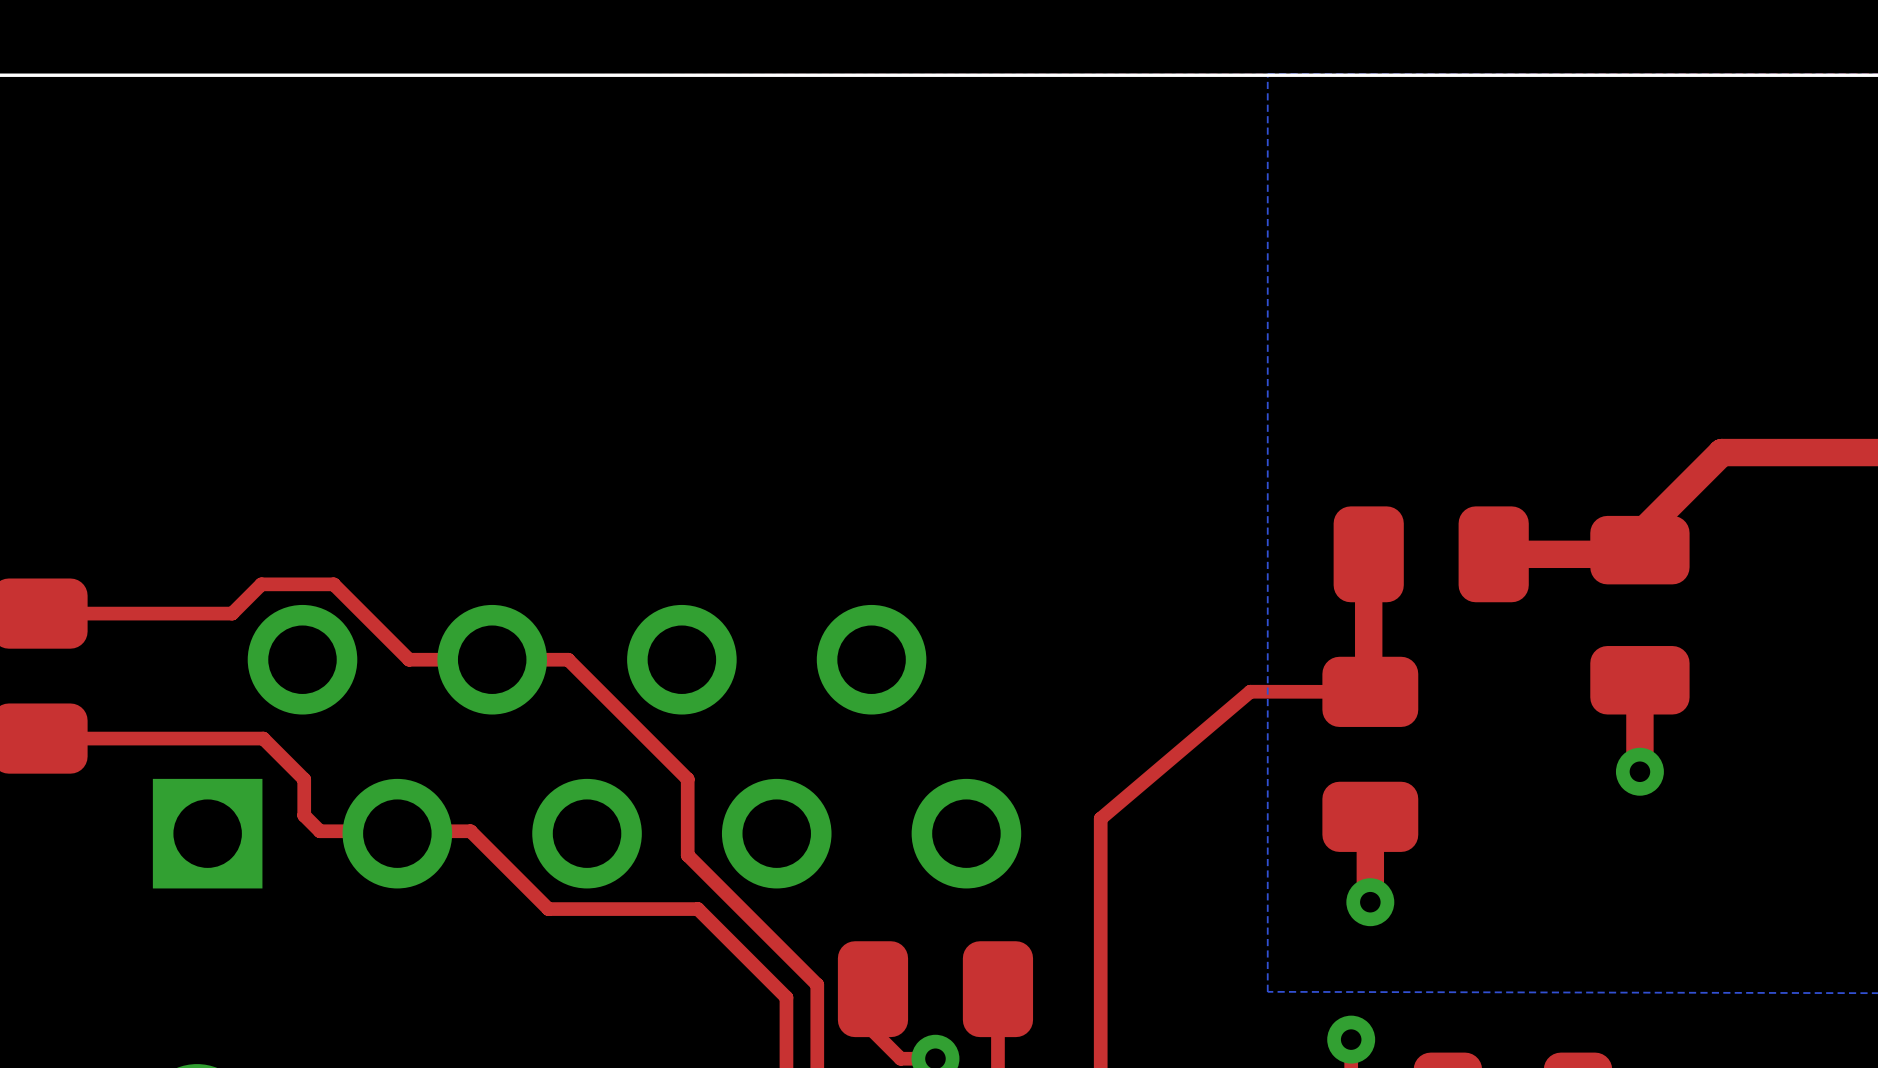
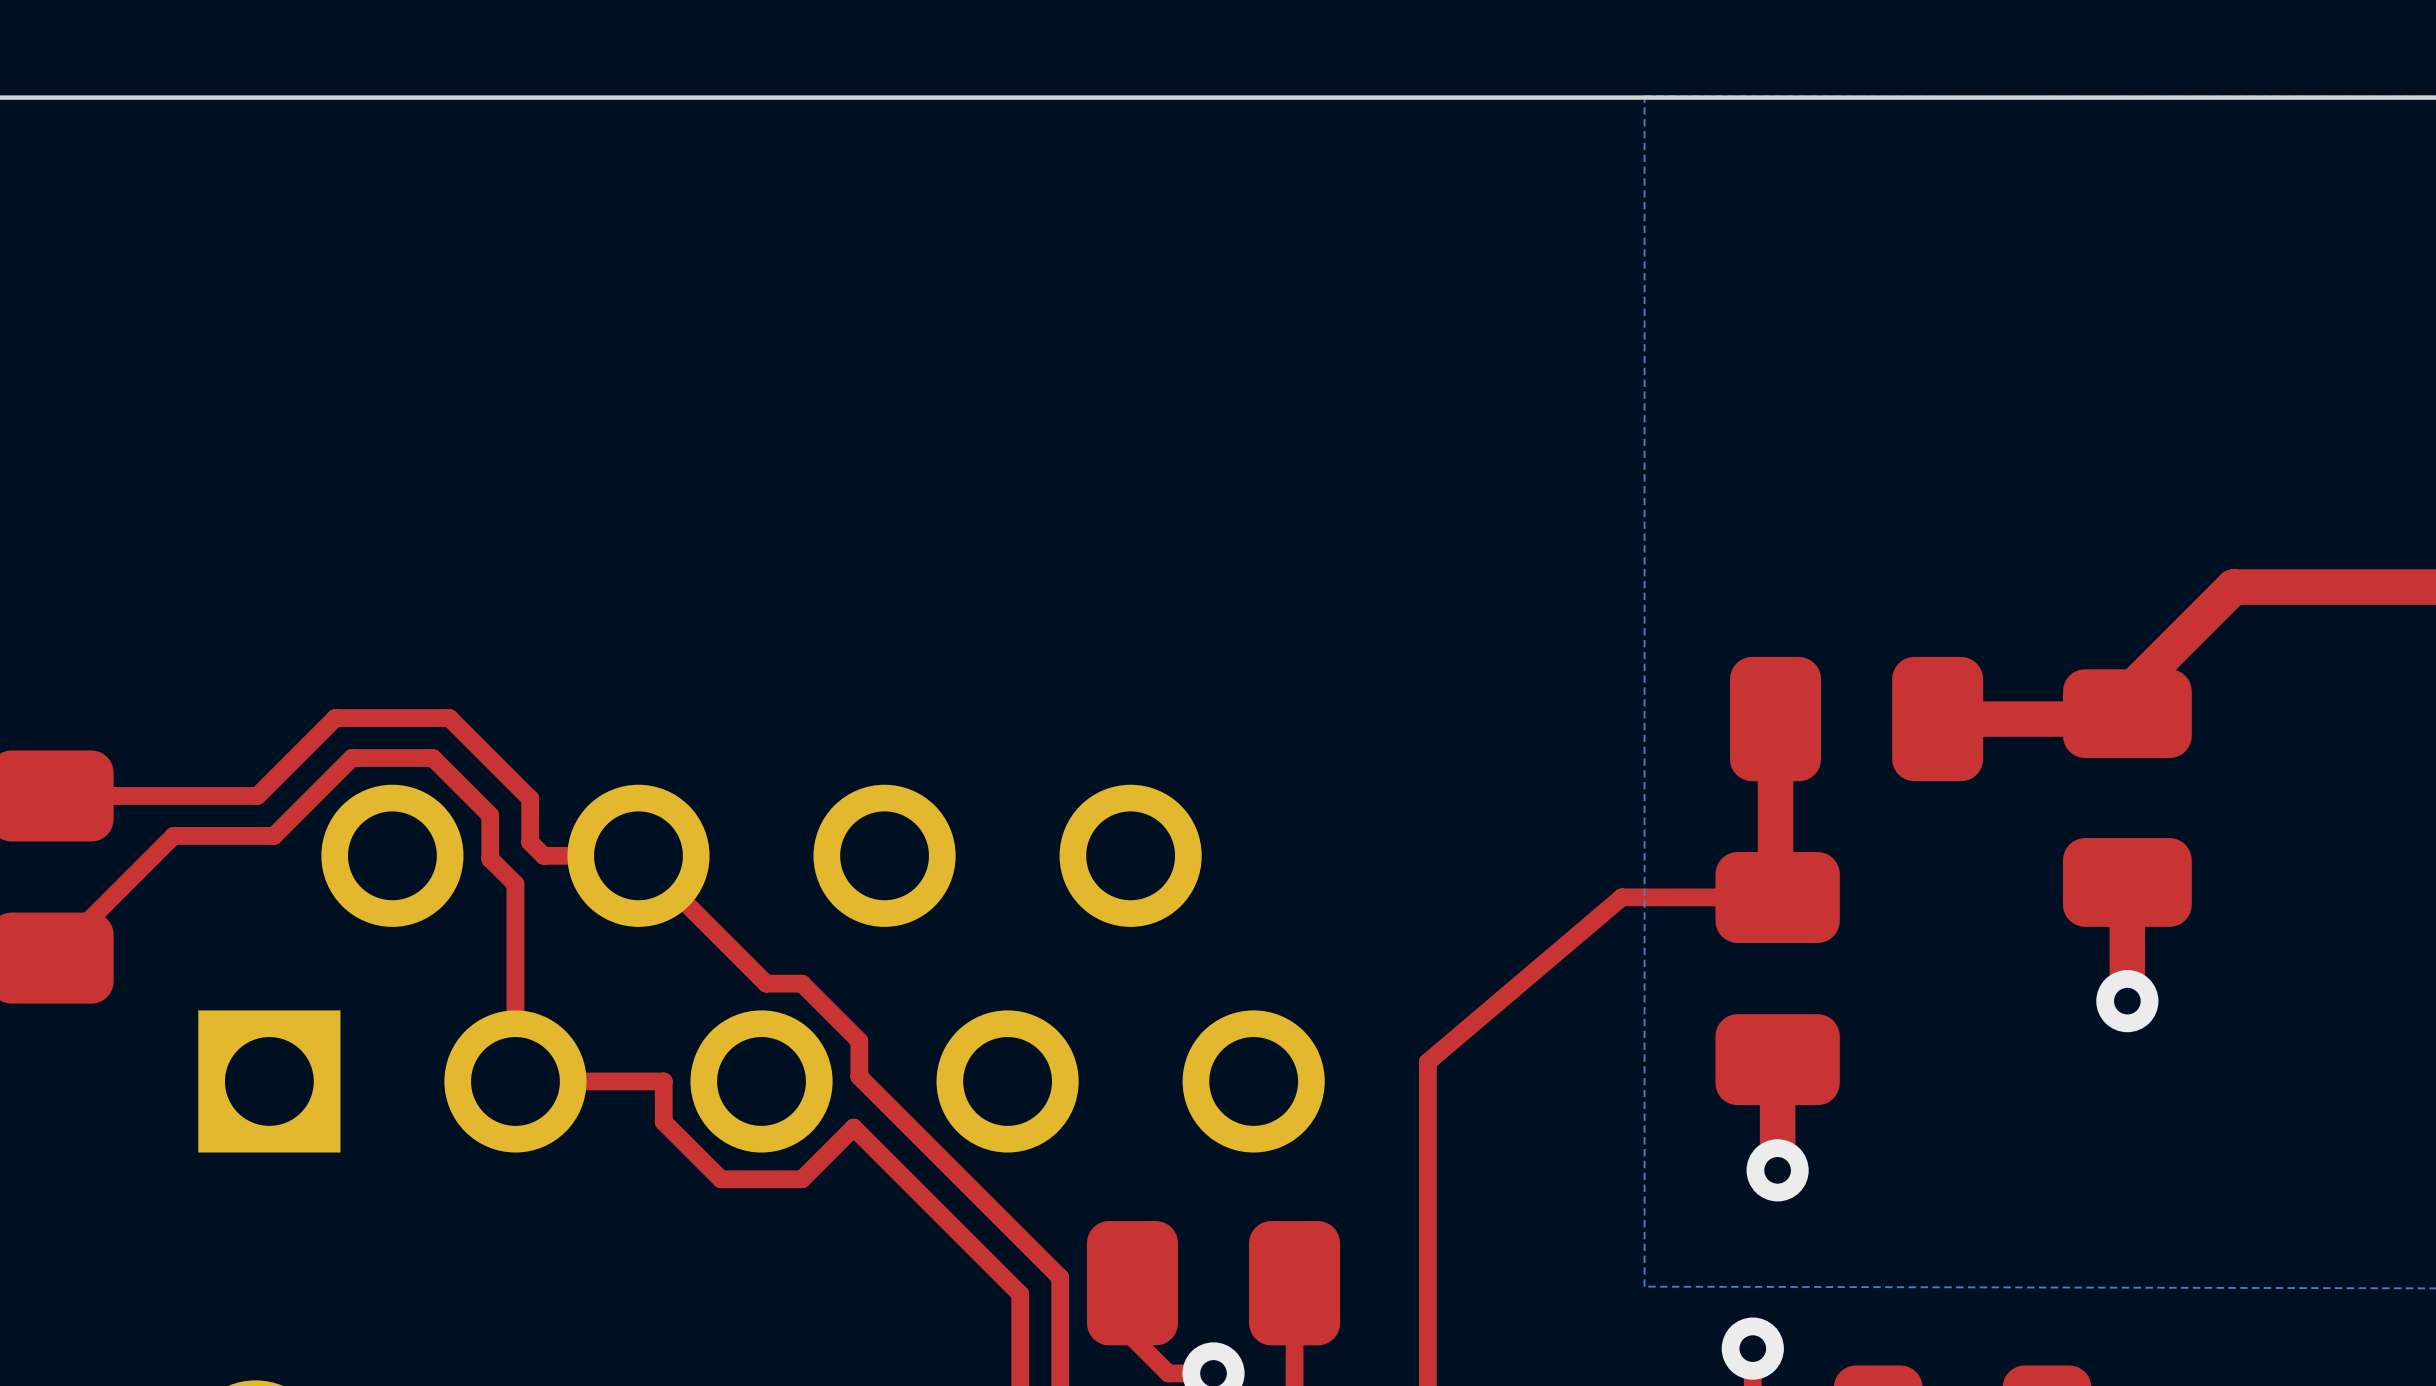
top track: (271, 584) (261, 584) (232, 613) (198, 613) -> (543, 855) (530, 842) (530, 798) (449, 718) (335, 718) (257, 795)
top track: (377, 628) (409, 659) (419, 659) -> (490, 815) (490, 858) (515, 884) (515, 1081) (663, 1081) (663, 1121) (721, 1179)
top track: (492, 659) (568, 659) (687, 779) (687, 855) -> (638, 855) (766, 983) (802, 983) (859, 1040) (859, 1076) (892, 1109)
top track: (39, 738) (263, 738) (304, 779) (304, 815) (319, 831) (394, 831) (397, 833) (399, 831) (470, 831) (548, 909) (555, 909) -> (51, 958) (173, 835) (273, 835) (351, 758)
top track: (697, 909) (618, 909) -> (905, 1179) (853, 1127) (802, 1179)

